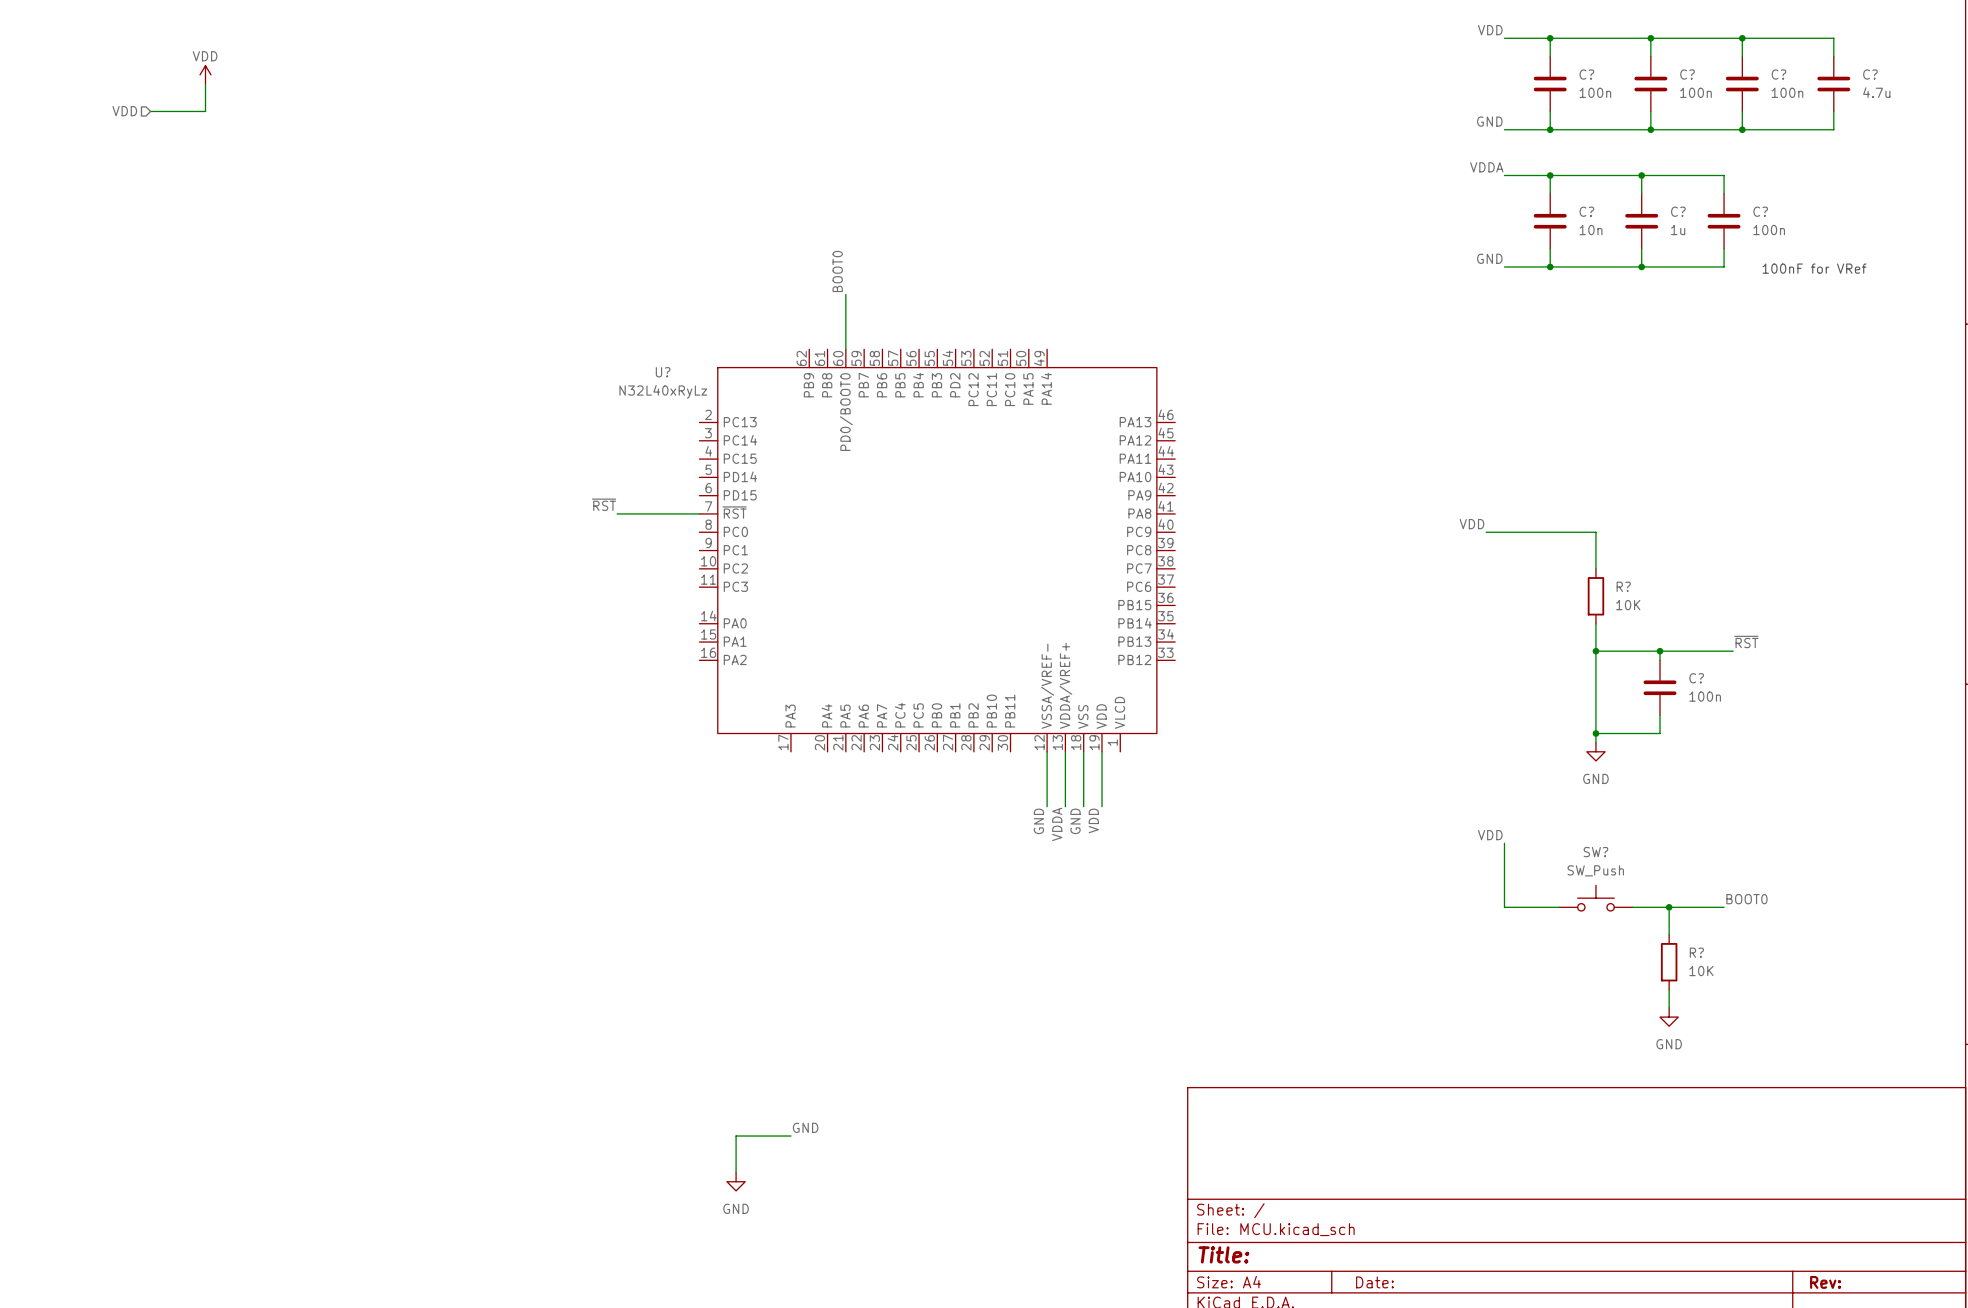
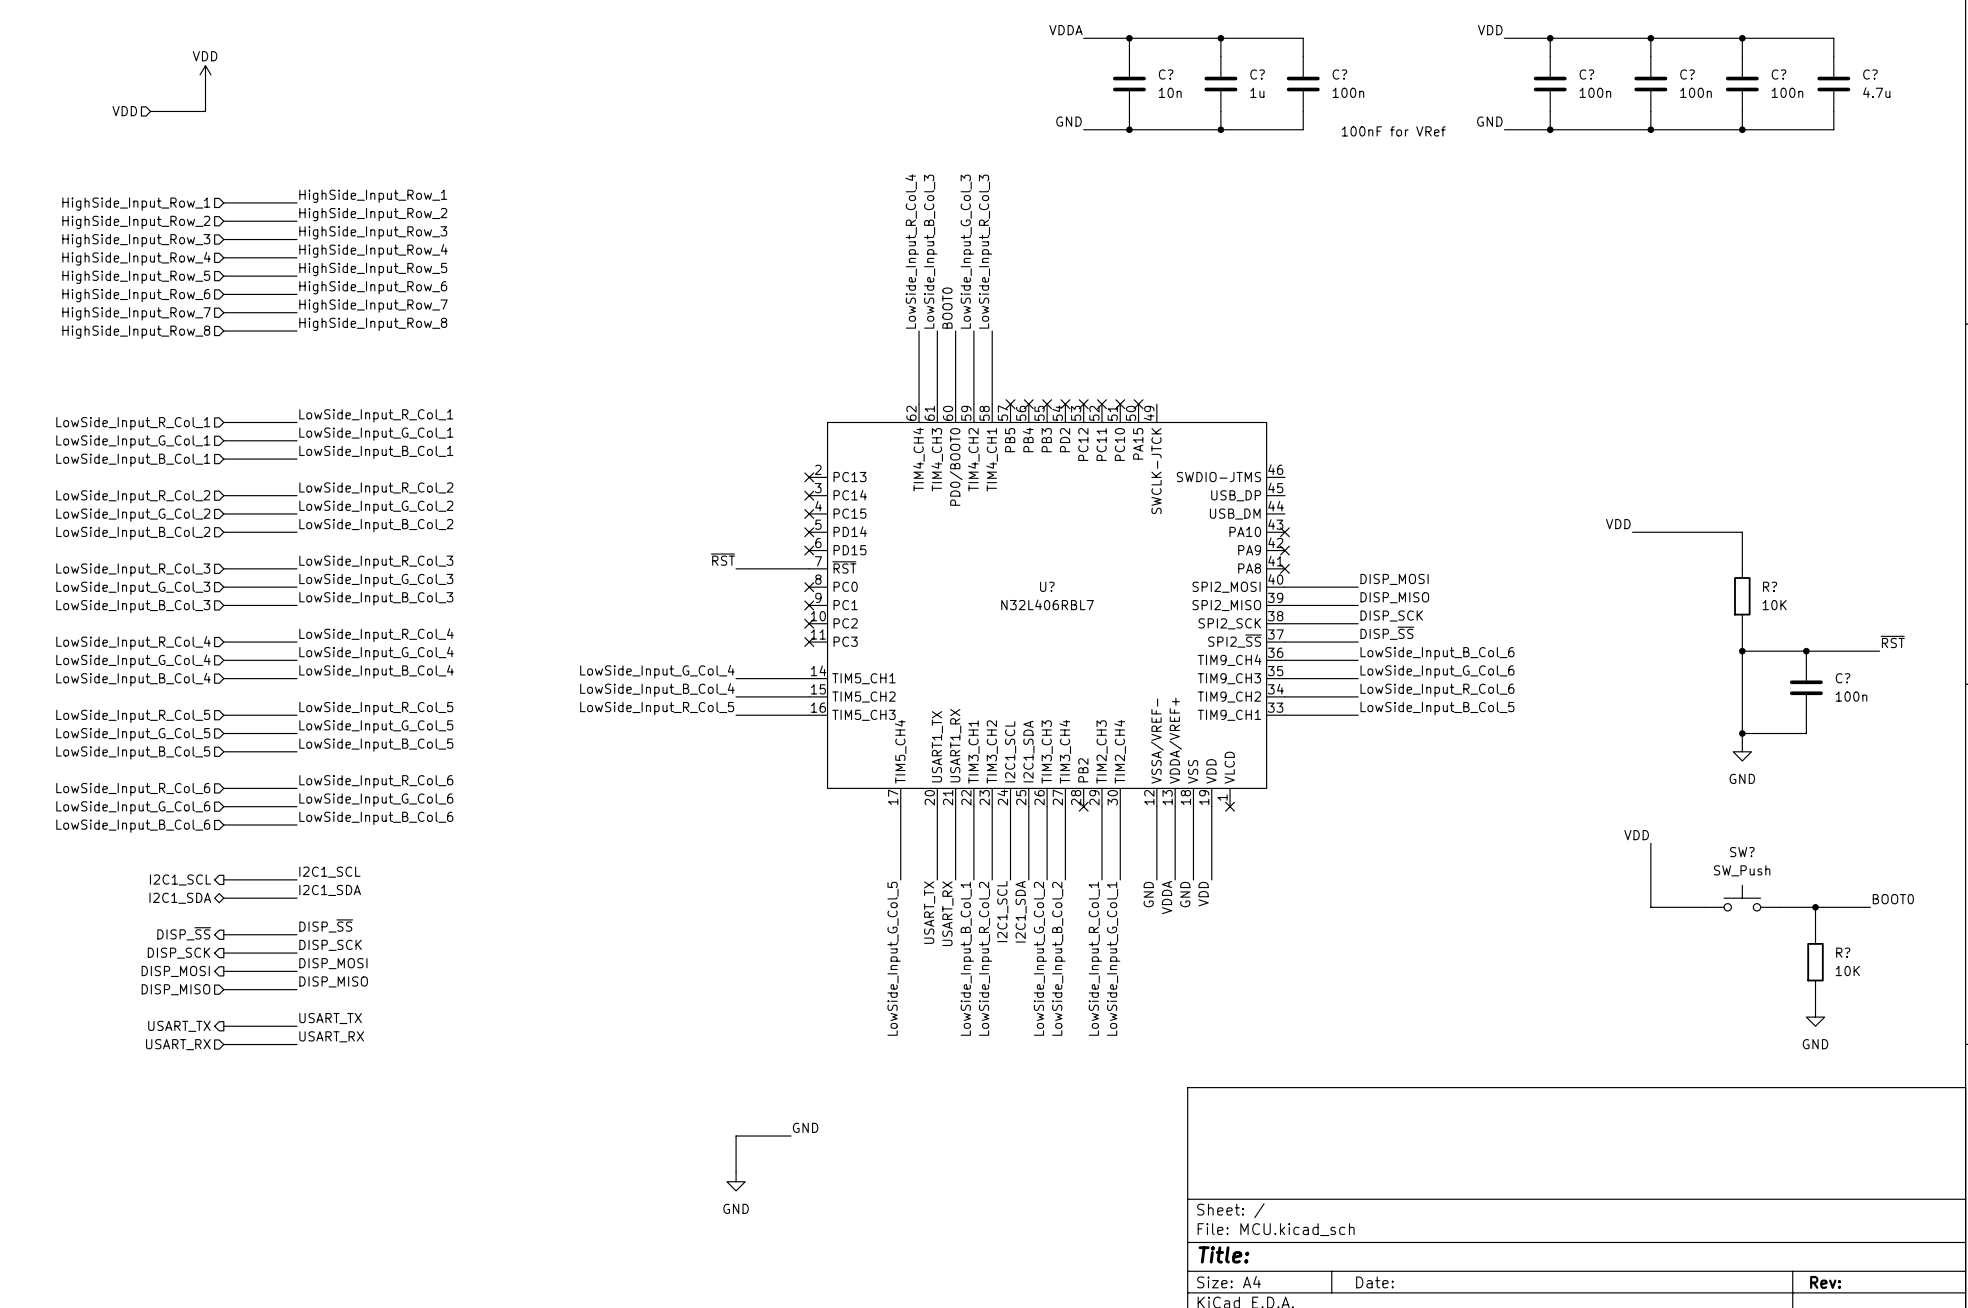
label: none -> VDDA (1065, 30)
wire: none -> (1083, 38) (1303, 38) (1303, 56)
wire: none -> (1129, 38) (1129, 56)
junction: none -> (1129, 38)
wire: none -> (1220, 38) (1220, 56)
junction: none -> (1220, 38)
C?: none -> 10n (1129, 84)
C?: none -> 1u (1220, 84)
C?: none -> 100n (1303, 84)
wire: none -> (1129, 111) (1129, 129)
wire: none -> (1220, 111) (1220, 129)
wire: none -> (1303, 111) (1303, 129) (1083, 129)
label: none -> GND (1069, 121)
junction: none -> (1129, 129)
junction: none -> (1220, 129)
text: none -> 100nF for VRef (1393, 131)
label: VDDA (1486, 167) -> none
wire: (1504, 175) (1724, 175) (1724, 193) -> none
wire: (1550, 175) (1550, 193) -> none
junction: (1550, 175) -> none
wire: (1641, 175) (1641, 193) -> none
junction: (1641, 175) -> none
label: none -> HighSide_Input_Row_1 (373, 196)
wire: none -> (223, 202) (296, 202)
hierarchical label: none -> HighSide_Input_Row_1 (136, 204)
label: none -> HighSide_Input_Row_2 (373, 214)
wire: none -> (223, 221) (296, 221)
C?: 10n (1550, 221) -> none
C?: 1u (1641, 221) -> none
C?: 100n (1724, 221) -> none
hierarchical label: none -> HighSide_Input_Row_2 (136, 222)
label: none -> HighSide_Input_Row_3 (373, 232)
wire: none -> (223, 239) (296, 239)
hierarchical label: none -> HighSide_Input_Row_3 (136, 240)
wire: (1550, 248) (1550, 266) -> none
wire: (1641, 248) (1641, 266) -> none
wire: (1724, 248) (1724, 266) (1504, 266) -> none
label: none -> HighSide_Input_Row_4 (373, 250)
label: none -> LowSide_Input_R_Col_4 (912, 251)
label: none -> LowSide_Input_B_Col_3 (930, 251)
label: none -> LowSide_Input_G_Col_3 (967, 251)
label: none -> LowSide_Input_R_Col_3 (985, 251)
wire: none -> (223, 257) (296, 257)
hierarchical label: none -> HighSide_Input_Row_4 (136, 258)
label: GND (1489, 258) -> none
junction: (1550, 266) -> none
junction: (1641, 266) -> none
text: 100nF for VRef (1814, 268) -> none
label: none -> HighSide_Input_Row_5 (373, 269)
label position: BOOT0 (837, 271) -> BOOT0 (947, 308)
wire: none -> (223, 276) (296, 276)
hierarchical label: none -> HighSide_Input_Row_5 (136, 277)
label: none -> HighSide_Input_Row_6 (373, 287)
wire: none -> (223, 294) (296, 294)
wire: (845, 294) (845, 349) -> none
hierarchical label: none -> HighSide_Input_Row_6 (136, 295)
label: none -> HighSide_Input_Row_7 (373, 306)
wire: none -> (223, 312) (296, 312)
hierarchical label: none -> HighSide_Input_Row_7 (136, 313)
label: none -> HighSide_Input_Row_8 (373, 324)
wire: none -> (223, 331) (296, 331)
wire: none -> (919, 331) (919, 404)
wire: none -> (937, 331) (937, 404)
wire: none -> (955, 331) (955, 404)
wire: none -> (973, 331) (973, 404)
wire: none -> (992, 331) (992, 404)
hierarchical label: none -> HighSide_Input_Row_8 (136, 332)
no-connect mark: none -> (1010, 404)
no-connect mark: none -> (1028, 404)
no-connect mark: none -> (1047, 404)
no-connect mark: none -> (1065, 404)
no-connect mark: none -> (1083, 404)
no-connect mark: none -> (1101, 404)
no-connect mark: none -> (1120, 404)
no-connect mark: none -> (1138, 404)
label: none -> LowSide_Input_R_Col_1 (376, 415)
wire: none -> (223, 422) (296, 422)
hierarchical label: none -> LowSide_Input_R_Col_1 (133, 423)
label: none -> LowSide_Input_G_Col_1 (376, 434)
wire: none -> (223, 440) (296, 440)
hierarchical label: none -> LowSide_Input_G_Col_1 (133, 441)
label: none -> LowSide_Input_B_Col_1 (376, 452)
wire: none -> (223, 459) (296, 459)
hierarchical label: none -> LowSide_Input_B_Col_1 (133, 460)
no-connect mark: none -> (809, 477)
label: none -> LowSide_Input_R_Col_2 (376, 489)
wire: none -> (223, 495) (296, 495)
no-connect mark: none -> (809, 495)
hierarchical label: none -> LowSide_Input_R_Col_2 (133, 496)
label position: ~{RST} (604, 504) -> ~{RST} (722, 559)
label: none -> LowSide_Input_G_Col_2 (376, 507)
wire: none -> (223, 513) (296, 513)
wire: (617, 513) (699, 513) -> none
no-connect mark: none -> (809, 513)
hierarchical label: none -> LowSide_Input_G_Col_2 (133, 515)
label position: VDD (1471, 524) -> VDD (1618, 524)
label: none -> LowSide_Input_B_Col_2 (376, 525)
wire: none -> (223, 532) (296, 532)
no-connect mark: none -> (809, 532)
no-connect mark: none -> (1284, 532)
wire: (1486, 532) (1595, 532) (1595, 568) -> (1632, 532) (1742, 532) (1742, 568)
hierarchical label: none -> LowSide_Input_B_Col_2 (133, 533)
no-connect mark: none -> (809, 550)
U?: N32L40xRyLz (937, 550) -> none
no-connect mark: none -> (1284, 550)
label: none -> LowSide_Input_R_Col_3 (376, 562)
wire: none -> (223, 568) (296, 568)
wire: none -> (736, 568) (809, 568)
no-connect mark: none -> (1284, 568)
hierarchical label: none -> LowSide_Input_R_Col_3 (133, 570)
label: none -> DISP_MOSI (1394, 579)
label: none -> LowSide_Input_G_Col_3 (376, 580)
wire: none -> (223, 587) (296, 587)
no-connect mark: none -> (809, 587)
wire: none -> (1284, 587) (1358, 587)
hierarchical label: none -> LowSide_Input_G_Col_3 (133, 588)
R? position: (1595, 596) -> (1742, 596)
label: none -> DISP_MISO (1394, 597)
label: none -> LowSide_Input_B_Col_3 (376, 598)
wire: none -> (223, 605) (296, 605)
no-connect mark: none -> (809, 605)
U?: none -> N32L406RBL7 (1047, 605)
wire: none -> (1284, 605) (1358, 605)
hierarchical label: none -> LowSide_Input_B_Col_3 (133, 606)
label: none -> DISP_SCK (1391, 616)
no-connect mark: none -> (809, 623)
wire: none -> (1284, 623) (1358, 623)
wire: (1595, 623) (1595, 742) -> (1742, 623) (1742, 742)
label: none -> DISP_~{SS} (1387, 633)
label: none -> LowSide_Input_R_Col_4 (376, 635)
label position: ~{RST} (1746, 641) -> ~{RST} (1892, 641)
wire: none -> (223, 642) (296, 642)
no-connect mark: none -> (809, 642)
wire: none -> (1284, 642) (1358, 642)
hierarchical label: none -> LowSide_Input_R_Col_4 (133, 643)
wire: (1595, 651) (1733, 651) -> (1742, 651) (1879, 651)
junction: (1595, 651) -> none
wire: (1660, 651) (1660, 660) -> (1806, 651) (1806, 660)
junction: (1660, 651) -> none
junction: none -> (1742, 651)
junction: none -> (1806, 651)
label: none -> LowSide_Input_G_Col_4 (376, 653)
label: none -> LowSide_Input_B_Col_6 (1437, 653)
wire: none -> (223, 660) (296, 660)
wire: none -> (1284, 660) (1358, 660)
hierarchical label: none -> LowSide_Input_G_Col_4 (133, 661)
label: none -> LowSide_Input_B_Col_4 (376, 671)
label: none -> LowSide_Input_G_Col_4 (657, 671)
label: none -> LowSide_Input_G_Col_6 (1437, 671)
wire: none -> (223, 678) (296, 678)
wire: none -> (736, 678) (809, 678)
wire: none -> (1284, 678) (1358, 678)
hierarchical label: none -> LowSide_Input_B_Col_4 (133, 679)
C? position: (1660, 687) -> (1806, 687)
label: none -> LowSide_Input_B_Col_4 (657, 690)
label: none -> LowSide_Input_R_Col_6 (1437, 690)
wire: none -> (736, 696) (809, 696)
wire: none -> (1284, 696) (1358, 696)
label: none -> LowSide_Input_R_Col_5 (376, 708)
label: none -> LowSide_Input_R_Col_5 (657, 708)
label: none -> LowSide_Input_B_Col_5 (1437, 708)
wire: none -> (223, 715) (296, 715)
wire: none -> (736, 715) (809, 715)
wire: none -> (1284, 715) (1358, 715)
wire: (1660, 715) (1660, 733) (1595, 733) -> (1806, 715) (1806, 733) (1742, 733)
hierarchical label: none -> LowSide_Input_R_Col_5 (133, 716)
label: none -> LowSide_Input_G_Col_5 (376, 726)
wire: none -> (223, 733) (296, 733)
junction: (1595, 733) -> none
junction: none -> (1742, 733)
hierarchical label: none -> LowSide_Input_G_Col_5 (133, 734)
label: none -> LowSide_Input_B_Col_5 (376, 745)
wire: none -> (223, 751) (296, 751)
wire: (1047, 751) (1047, 806) -> (1047, 879) (1047, 806)
wire: (1065, 751) (1065, 806) -> (1065, 879) (1065, 806)
wire: (1101, 751) (1101, 806) -> (1101, 879) (1101, 806)
power symbol: GND (1595, 751) -> none
power symbol: none -> GND (1742, 751)
hierarchical label: none -> LowSide_Input_B_Col_5 (133, 752)
label: none -> LowSide_Input_R_Col_6 (376, 781)
wire: none -> (223, 788) (296, 788)
hierarchical label: none -> LowSide_Input_R_Col_6 (133, 789)
label: none -> LowSide_Input_G_Col_6 (376, 800)
wire: none -> (223, 806) (296, 806)
wire: none -> (900, 806) (900, 879)
wire: none -> (937, 806) (937, 879)
wire: none -> (955, 806) (955, 879)
wire: none -> (973, 806) (973, 879)
wire: none -> (992, 806) (992, 879)
wire: none -> (1010, 806) (1010, 879)
wire: none -> (1028, 806) (1028, 879)
no-connect mark: none -> (1083, 806)
wire: none -> (1120, 806) (1120, 879)
wire: none -> (1156, 806) (1156, 879)
wire: none -> (1175, 806) (1175, 879)
wire: none -> (1193, 806) (1193, 879)
wire: none -> (1211, 806) (1211, 879)
no-connect mark: none -> (1230, 806)
hierarchical label: none -> LowSide_Input_G_Col_6 (133, 807)
label: none -> LowSide_Input_B_Col_6 (376, 818)
label position: VDD (1093, 820) -> VDD (1203, 894)
label: GND (1038, 821) -> none
label: GND (1075, 821) -> none
wire: none -> (223, 824) (296, 824)
label position: VDDA (1057, 824) -> VDDA (1167, 897)
hierarchical label: none -> LowSide_Input_B_Col_6 (133, 826)
label position: VDD (1490, 835) -> VDD (1636, 835)
wire: (1504, 843) (1504, 907) (1559, 907) -> none
label: none -> I2C1_SCL (329, 872)
hierarchical label: none -> I2C1_SCL (180, 879)
wire: none -> (223, 879) (296, 879)
label: none -> I2C1_SDA (330, 890)
label: none -> GND (1148, 894)
label: none -> GND (1185, 894)
hierarchical label: none -> I2C1_SDA (180, 898)
wire: none -> (223, 898) (296, 898)
SW? position: (1595, 898) -> (1742, 898)
label position: BOOT0 (1746, 899) -> BOOT0 (1893, 899)
wire: (1632, 907) (1650, 907) -> (1650, 843) (1650, 907)
wire: (1669, 907) (1669, 934) -> (1815, 907) (1815, 934)
junction: (1669, 907) -> none
wire: none -> (1778, 907) (1870, 907)
junction: none -> (1815, 907)
label: none -> I2C1_SCL (1002, 911)
label: none -> I2C1_SDA (1021, 911)
label: none -> USART_TX (929, 912)
label: none -> USART_RX (947, 913)
label: none -> DISP_~{SS} (326, 925)
hierarchical label: none -> DISP_~{SS} (184, 933)
wire: none -> (223, 934) (296, 934)
label: none -> DISP_SCK (330, 945)
hierarchical label: none -> DISP_SCK (179, 953)
wire: none -> (223, 953) (296, 953)
label: none -> LowSide_Input_G_Col_5 (894, 958)
label: none -> LowSide_Input_B_Col_1 (967, 958)
label: none -> LowSide_Input_R_Col_2 (985, 958)
label: none -> LowSide_Input_G_Col_2 (1040, 958)
label: none -> LowSide_Input_B_Col_2 (1058, 958)
label: none -> LowSide_Input_R_Col_1 (1095, 958)
label: none -> LowSide_Input_G_Col_1 (1113, 958)
R? position: (1669, 962) -> (1815, 962)
label: none -> DISP_MOSI (333, 963)
hierarchical label: none -> DISP_MOSI (175, 971)
wire: none -> (223, 971) (296, 971)
label: none -> DISP_MISO (333, 981)
hierarchical label: none -> DISP_MISO (175, 989)
wire: none -> (223, 989) (296, 989)
wire: (1669, 989) (1669, 1007) -> (1815, 989) (1815, 1007)
power symbol: GND (1669, 1017) -> none
power symbol: none -> GND (1815, 1017)
label: none -> USART_TX (330, 1018)
hierarchical label: none -> USART_TX (179, 1026)
wire: none -> (223, 1026) (296, 1026)
label: none -> USART_RX (331, 1036)
hierarchical label: none -> USART_RX (178, 1044)
wire: none -> (223, 1044) (296, 1044)

